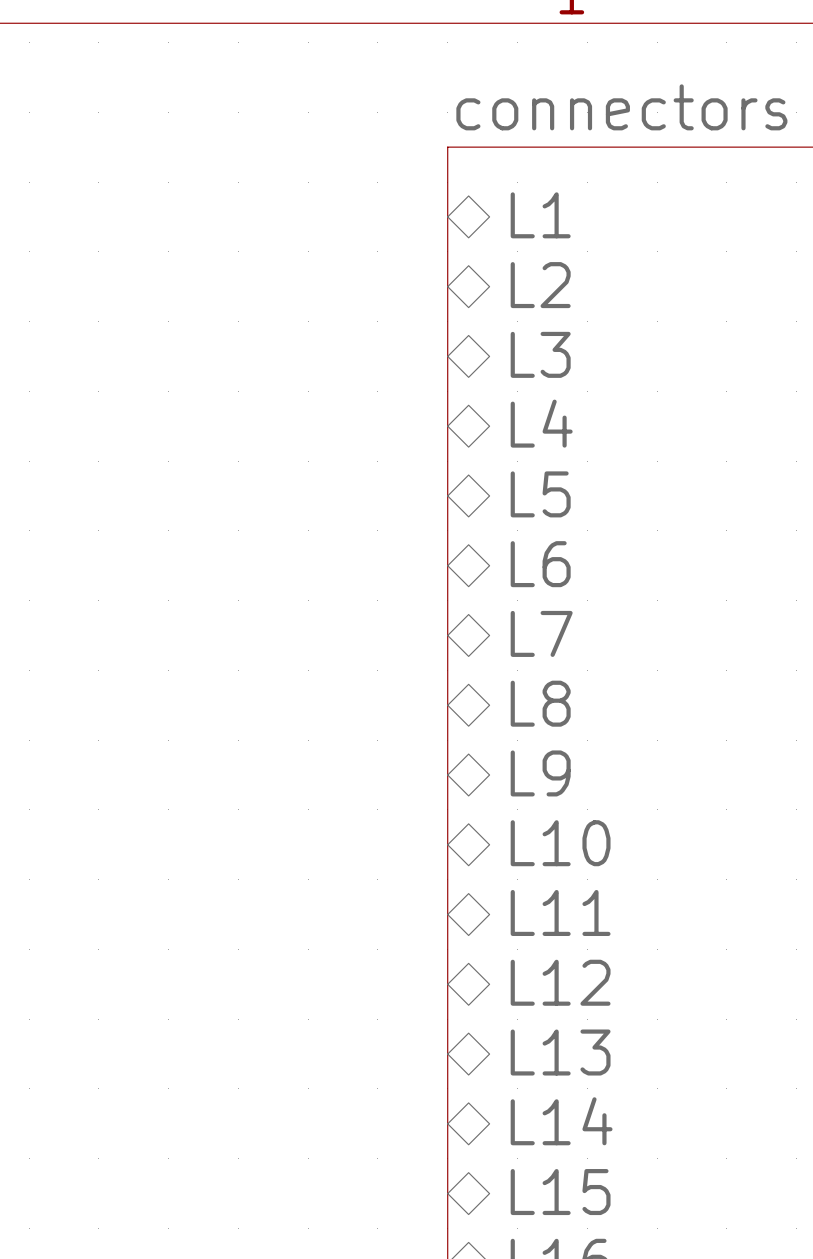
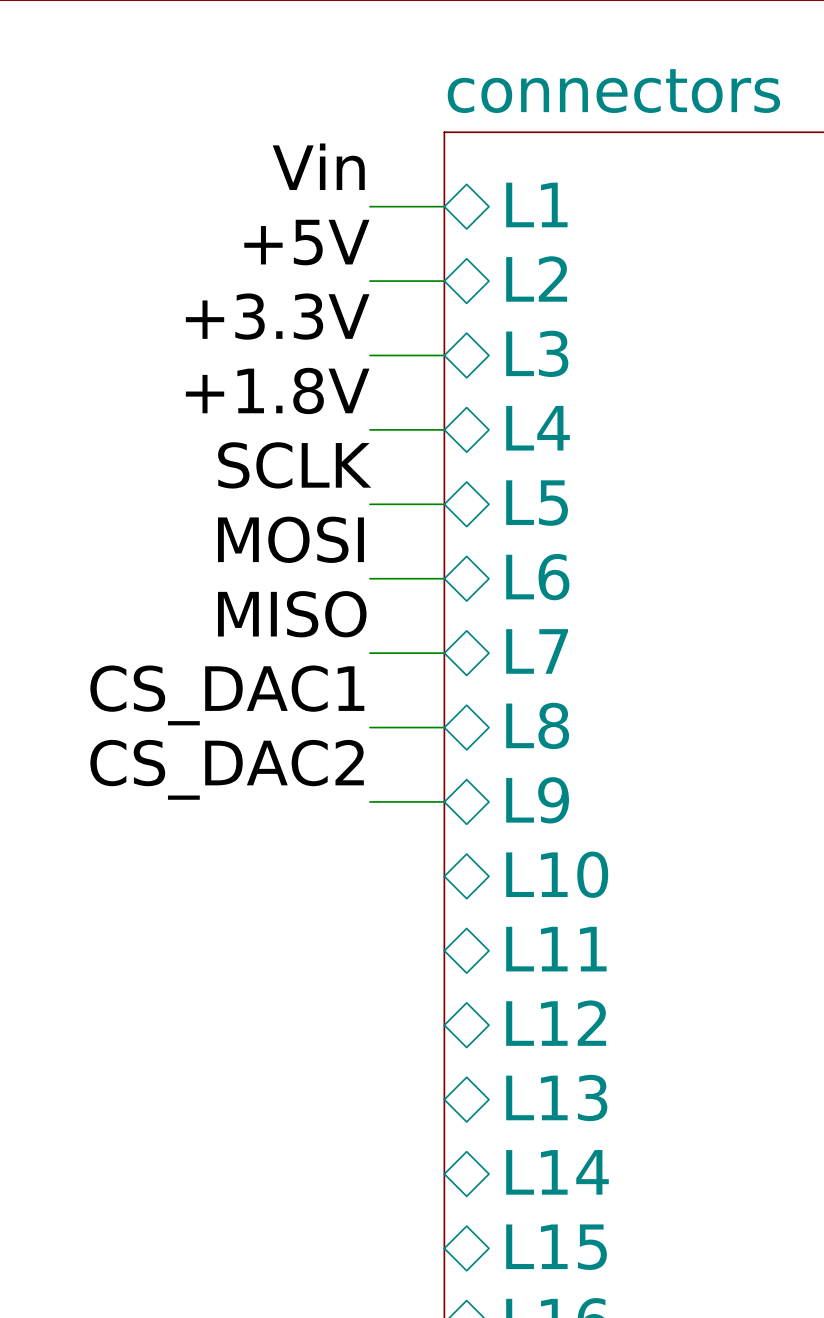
label: none -> Vin (318, 166)
wire: none -> (369, 206) (444, 206)
label: none -> +5V (306, 242)
wire: none -> (369, 281) (444, 281)
label: none -> +3.3V (277, 316)
wire: none -> (369, 355) (444, 355)
label: none -> +1.8V (277, 390)
wire: none -> (369, 429) (444, 429)
label: none -> SCLK (294, 465)
wire: none -> (369, 504) (444, 504)
label: none -> MOSI (290, 539)
wire: none -> (369, 578) (444, 578)
label: none -> MISO (292, 614)
wire: none -> (369, 653) (444, 653)
label: none -> CS_DAC1 (227, 695)
wire: none -> (369, 727) (444, 727)
label: none -> CS_DAC2 (227, 769)
wire: none -> (369, 801) (444, 801)

